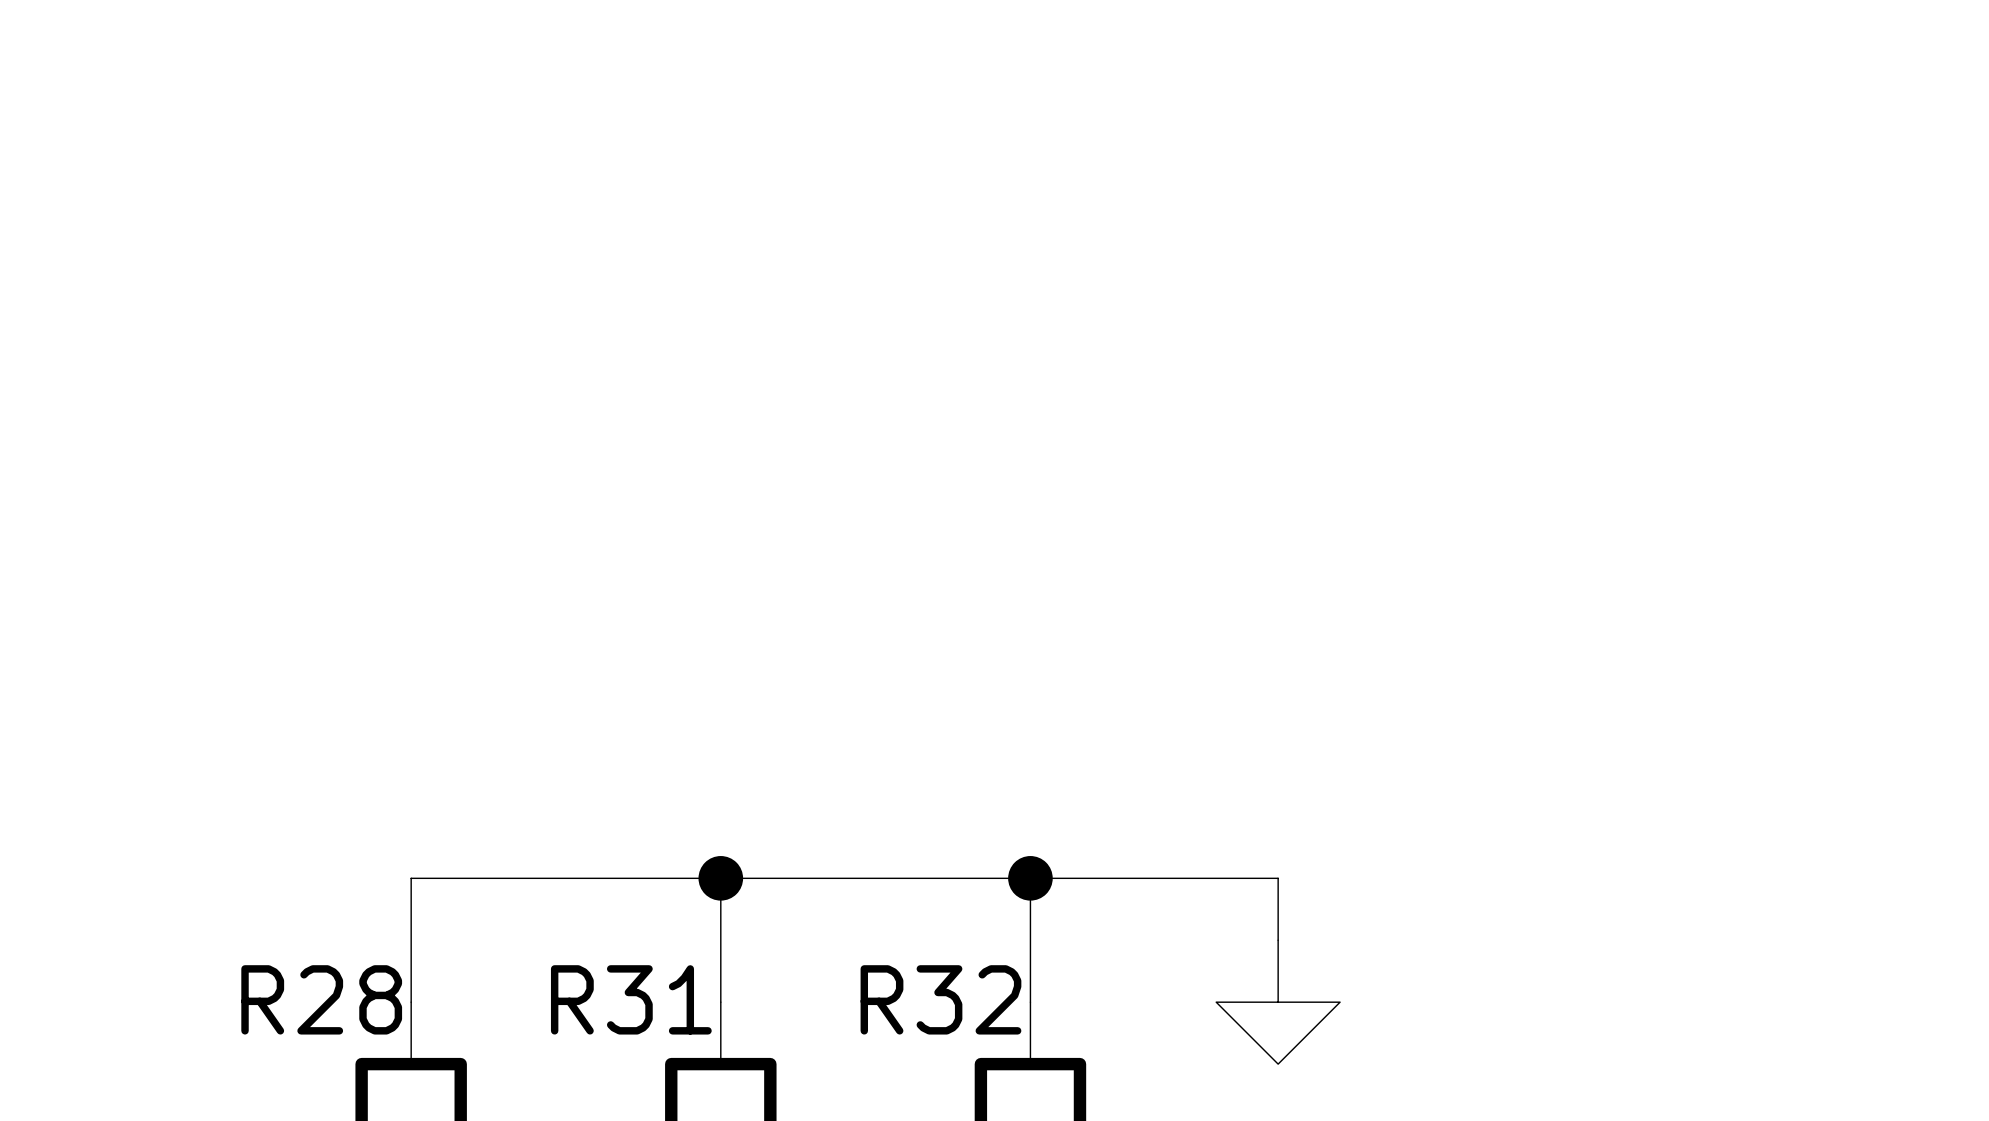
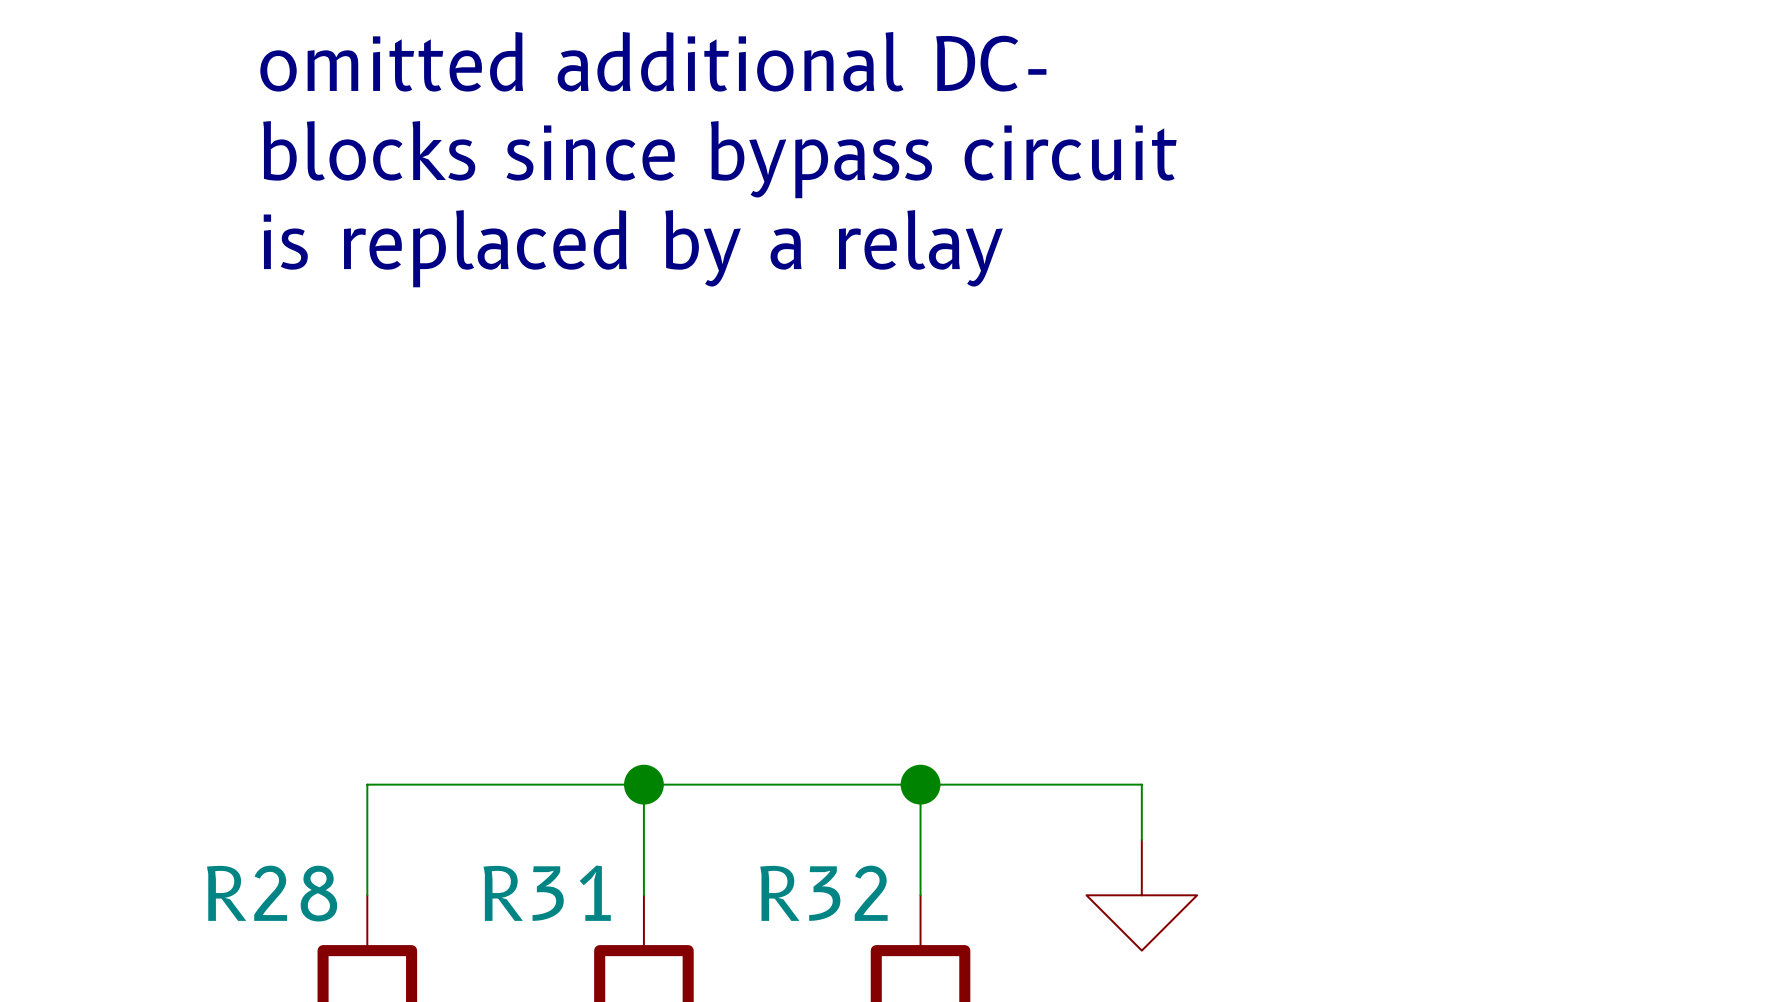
text: none -> omitted additional DC- (653, 61)
text: none -> blocks since bypass circuit (719, 159)
text: none -> is replaced by a relay (633, 248)

